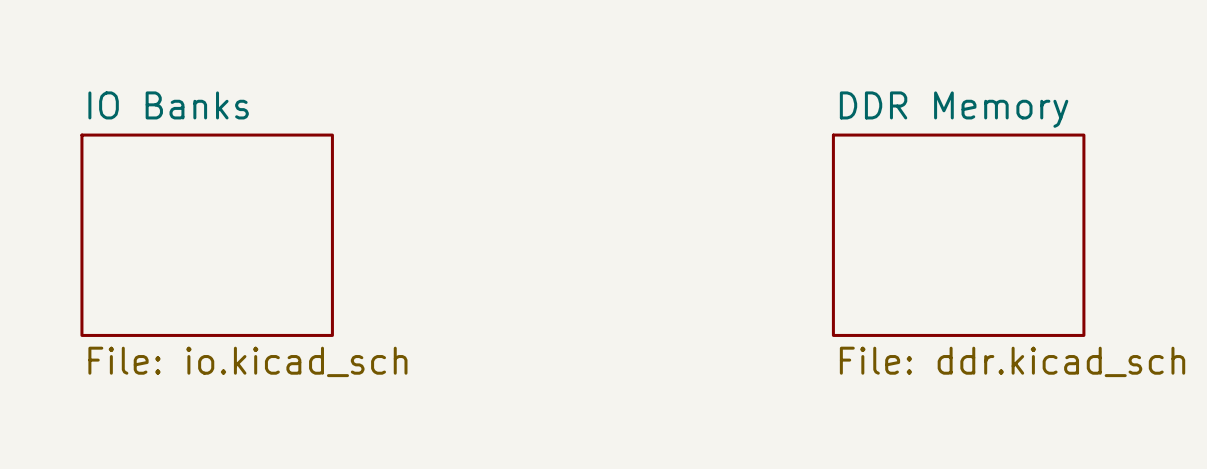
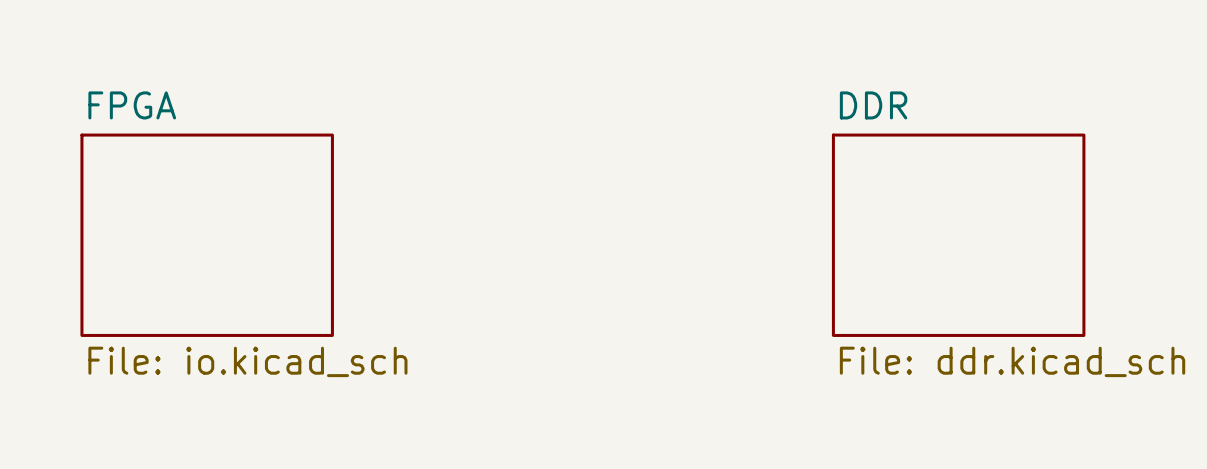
sheet IO Banks name: IO Banks (168, 105) -> FPGA (132, 105)
sheet DDR Memory name: DDR Memory (954, 109) -> DDR (873, 105)

